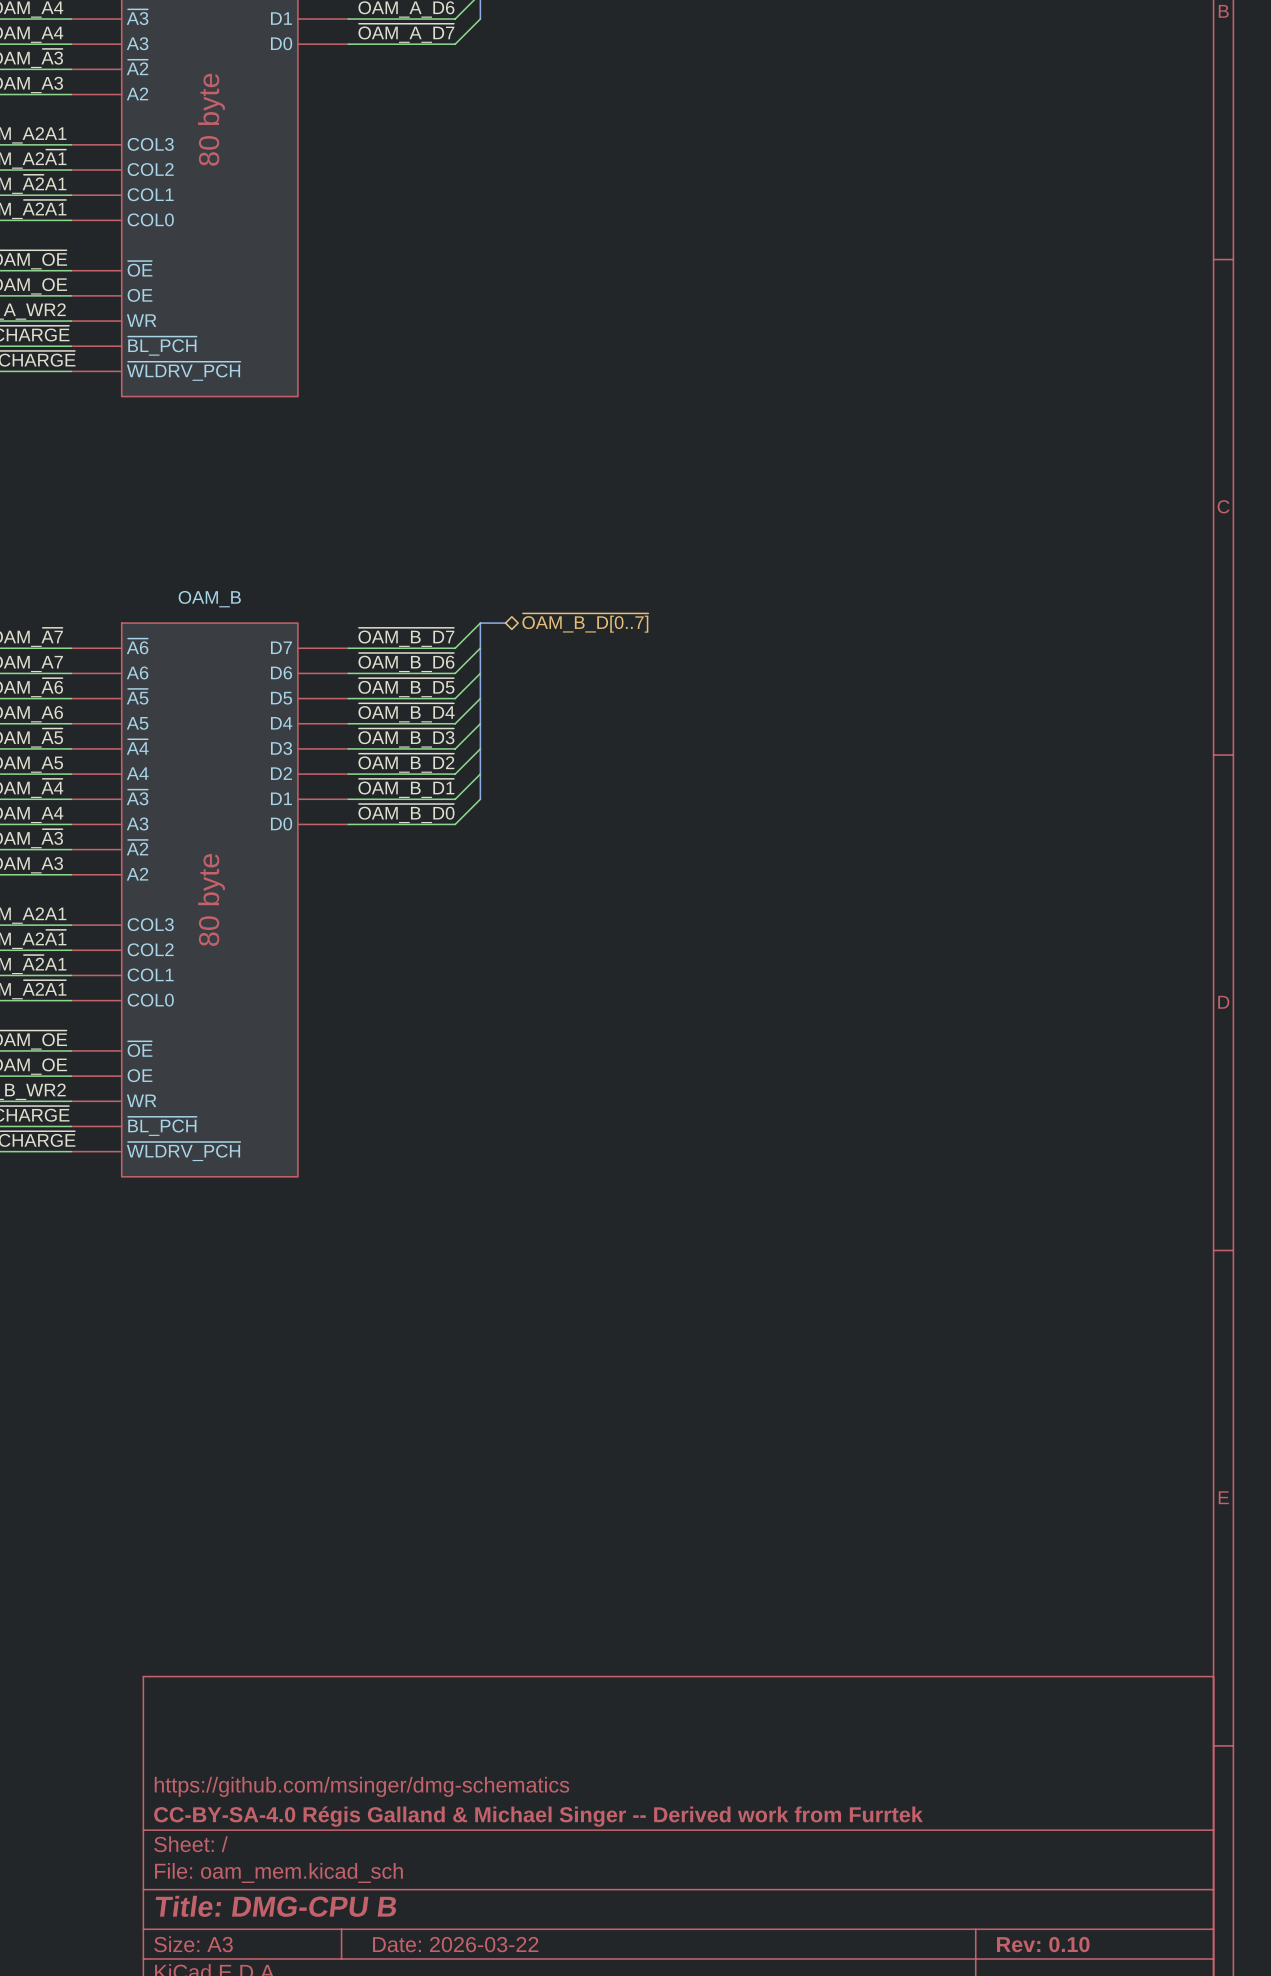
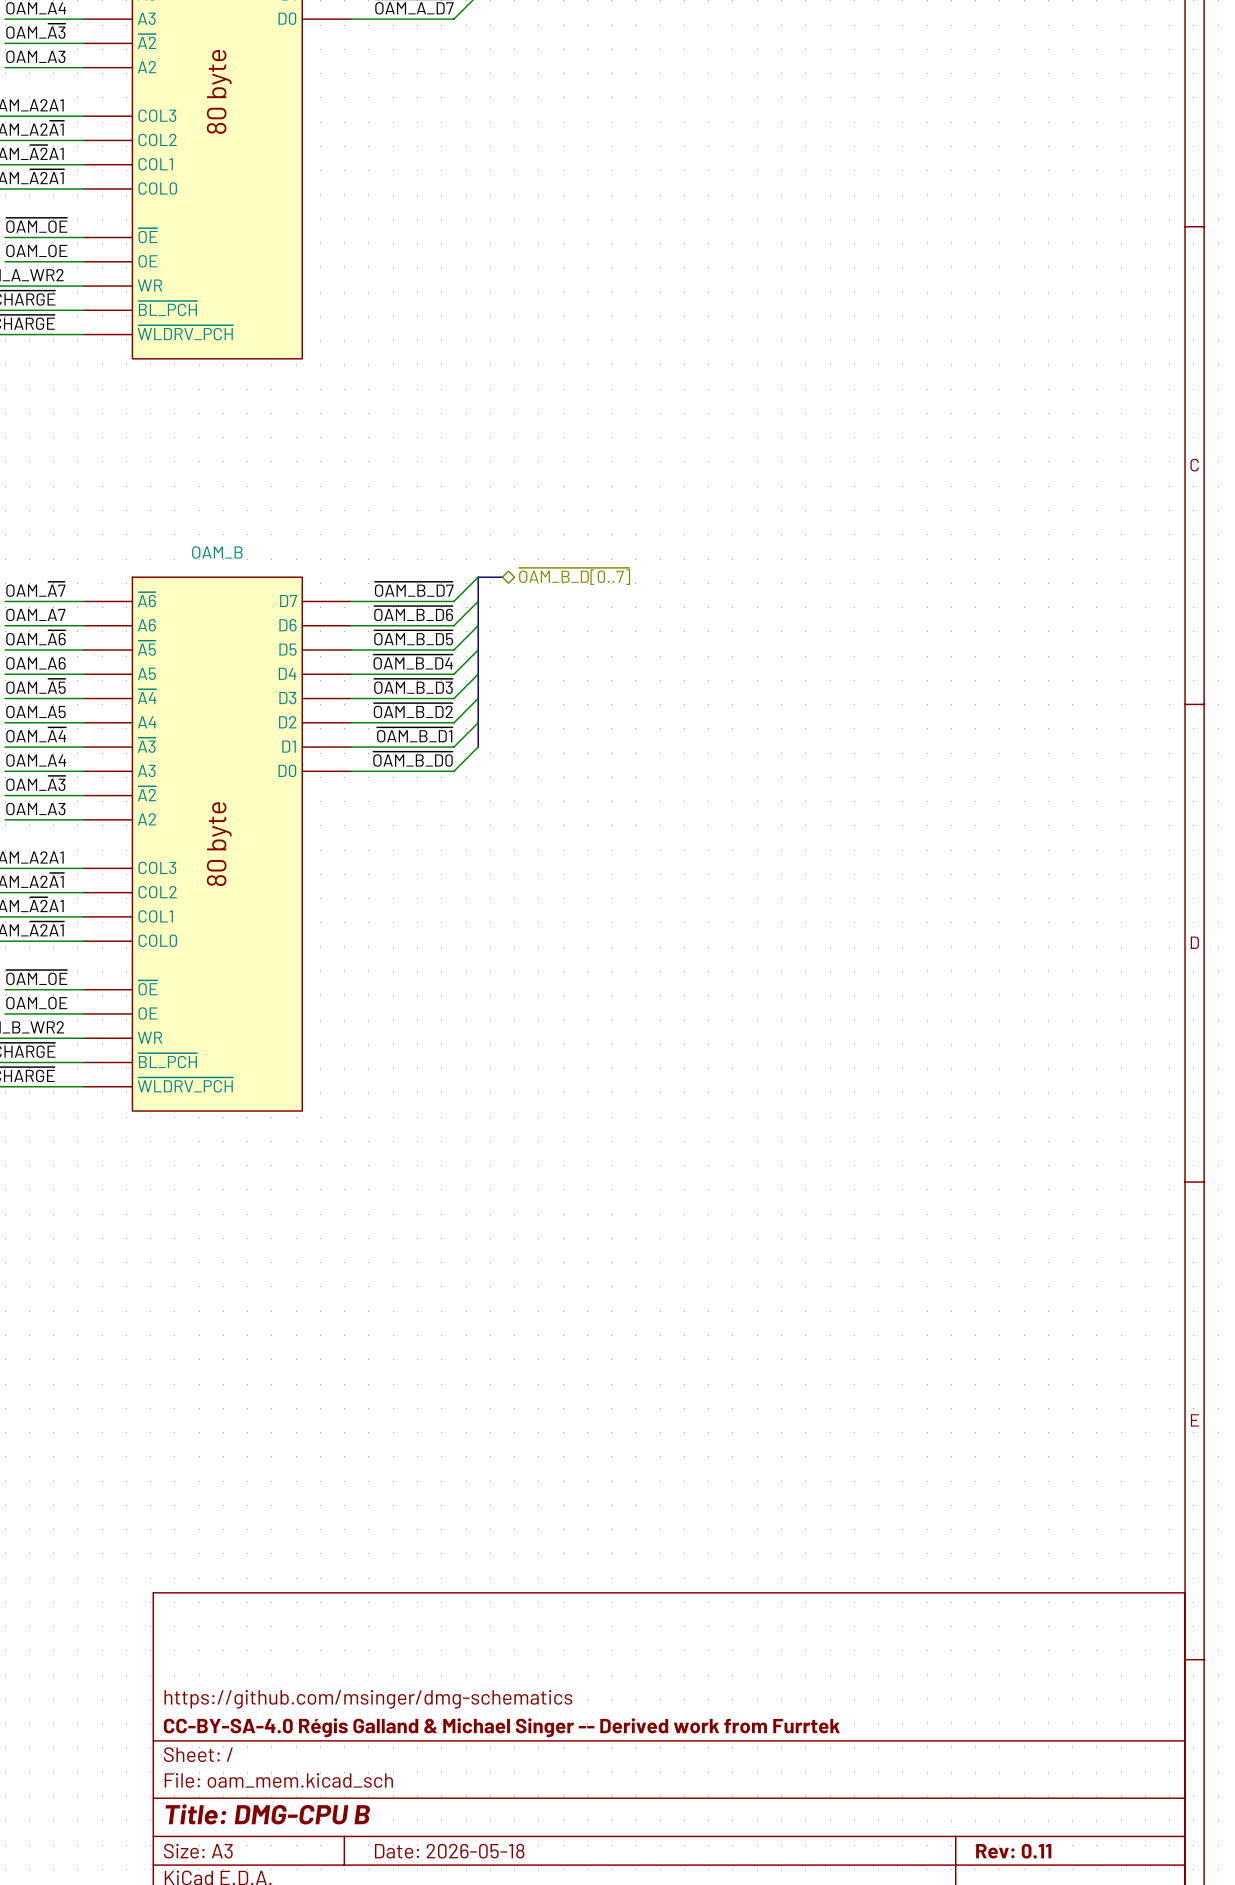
title block: Date: 2026-03-22 (455, 1944) -> Date: 2026-05-18 (449, 1851)
title block: Rev: 0.10 (1043, 1944) -> Rev: 0.11 (1013, 1851)

